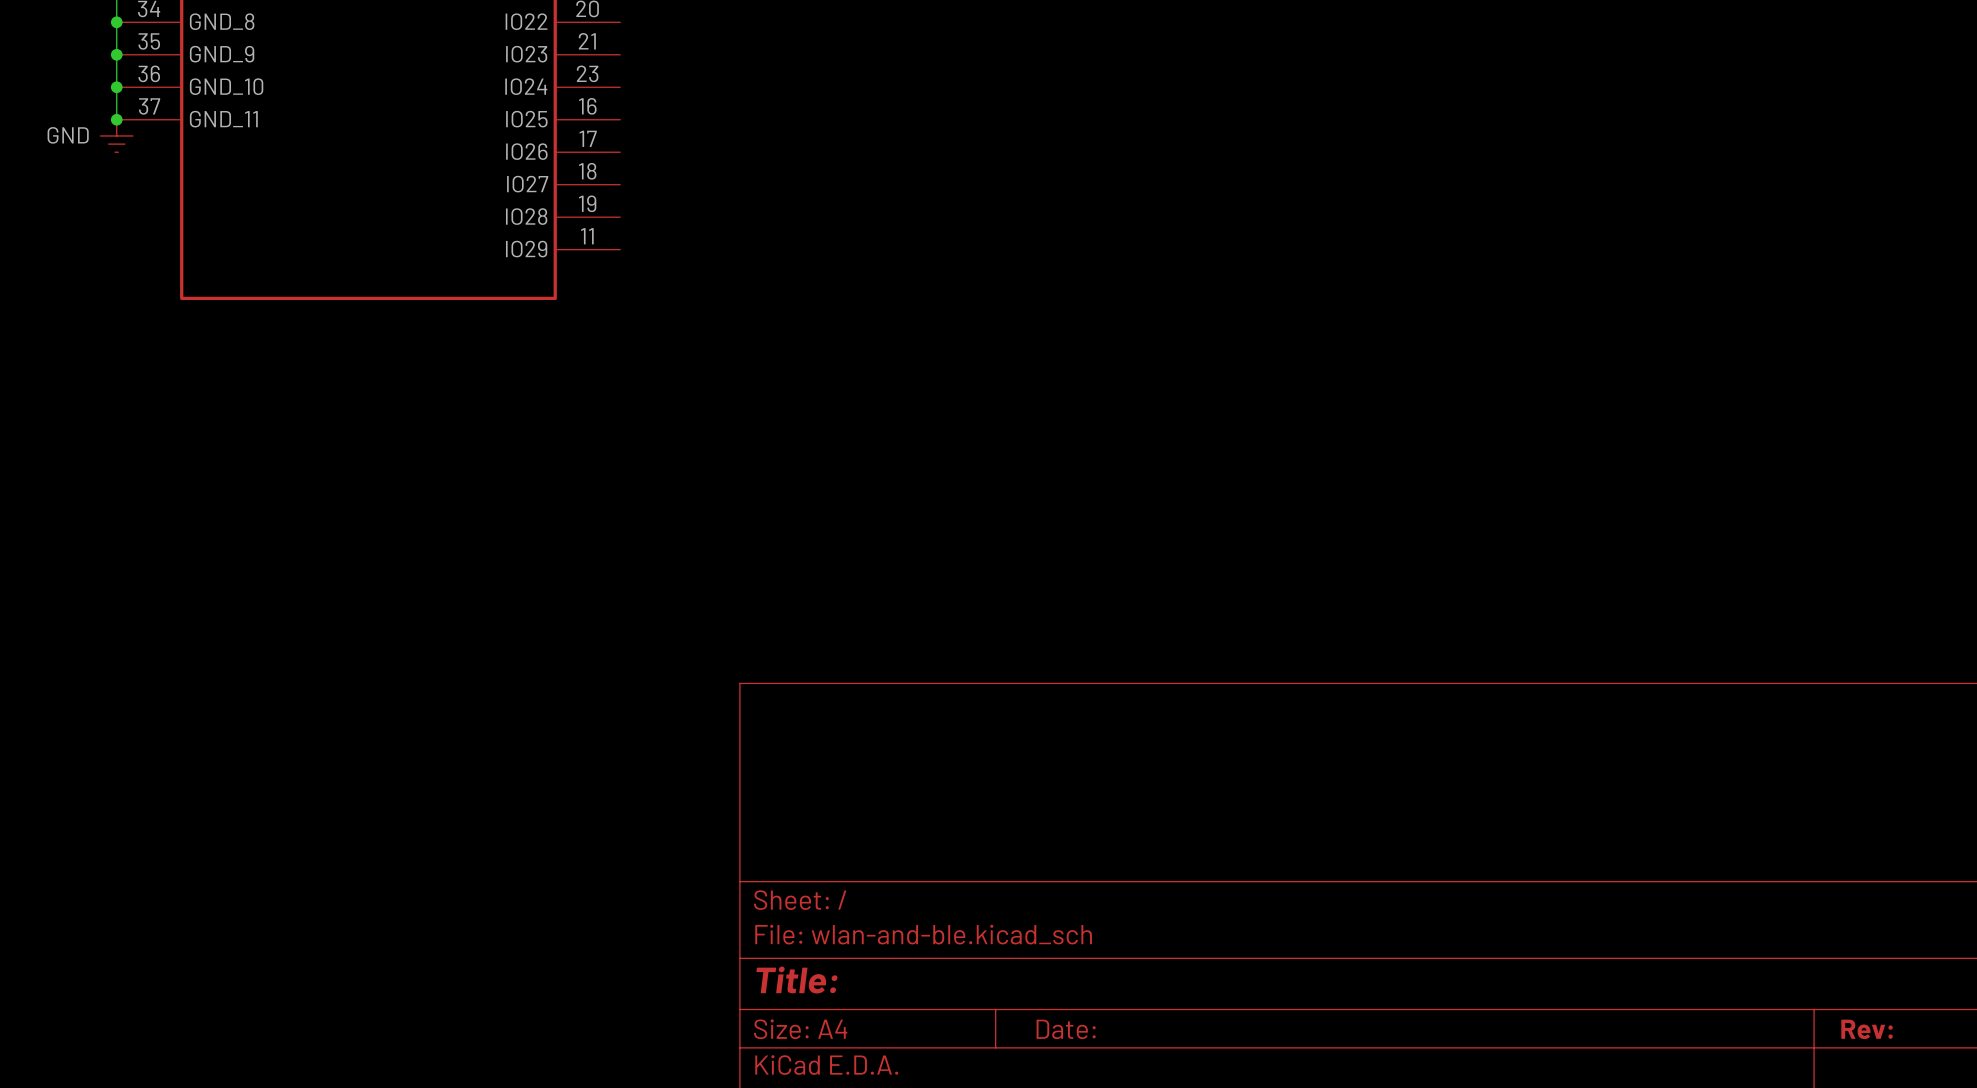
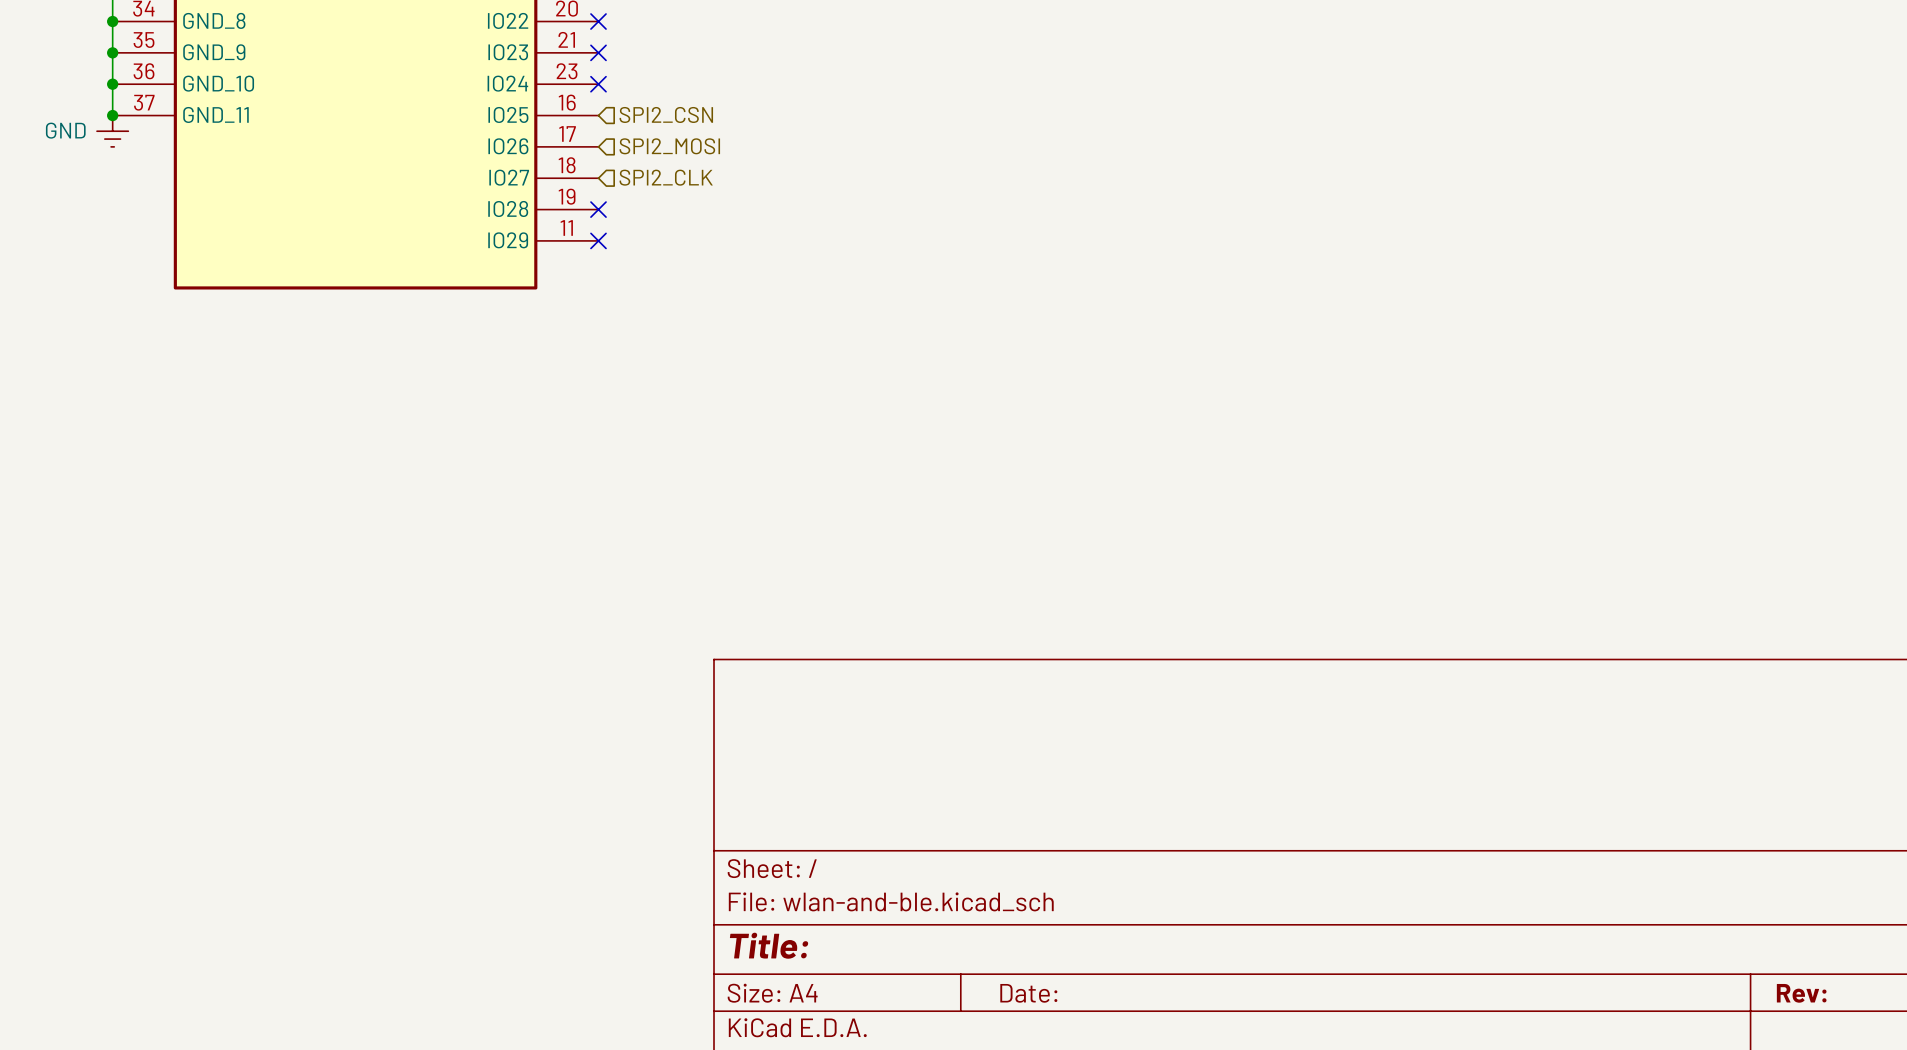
no-connect mark: none -> (598, 21)
no-connect mark: none -> (598, 52)
no-connect mark: none -> (598, 84)
hierarchical label: none -> SPI2_CSN (666, 114)
hierarchical label: none -> SPI2_MOSI (669, 146)
hierarchical label: none -> SPI2_CLK (666, 177)
no-connect mark: none -> (598, 209)
no-connect mark: none -> (598, 240)

